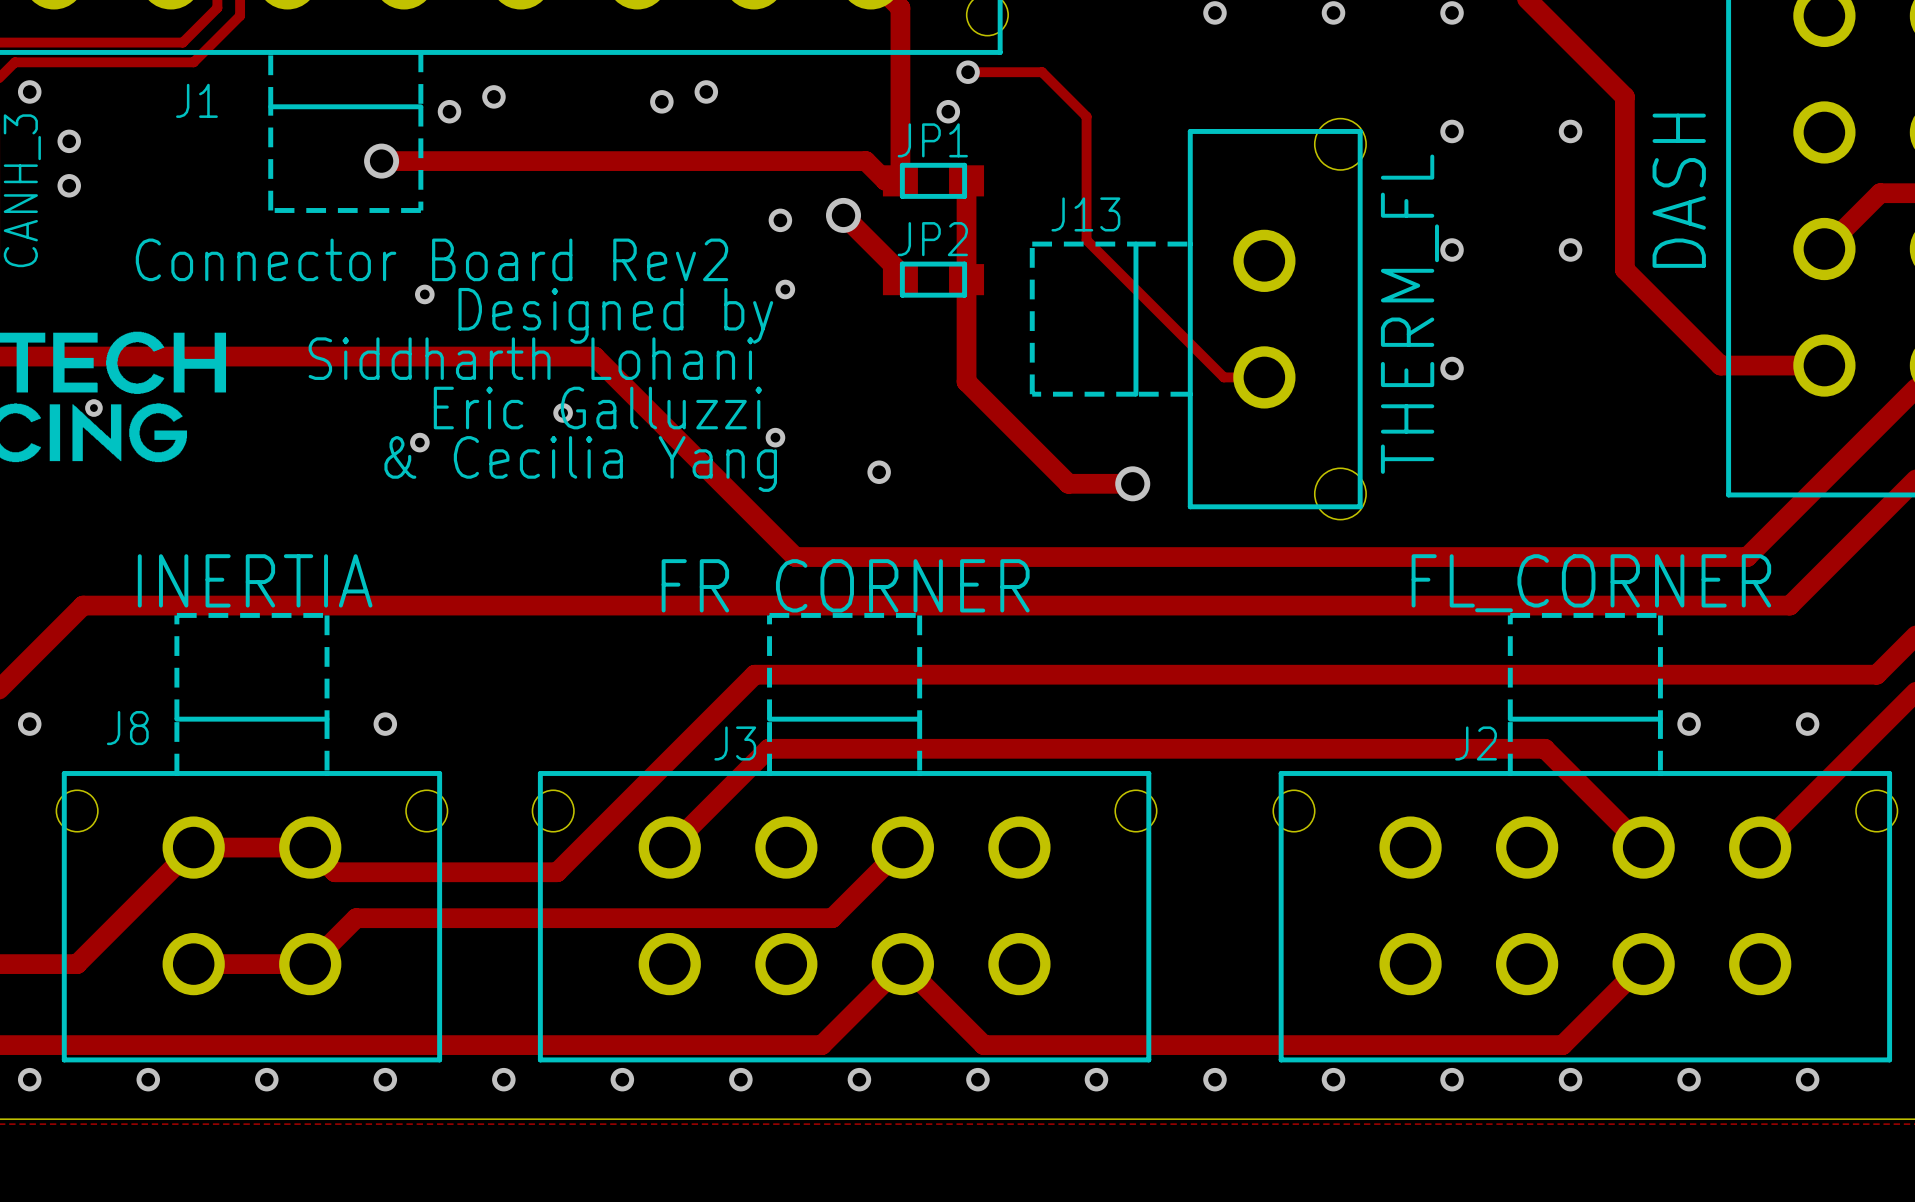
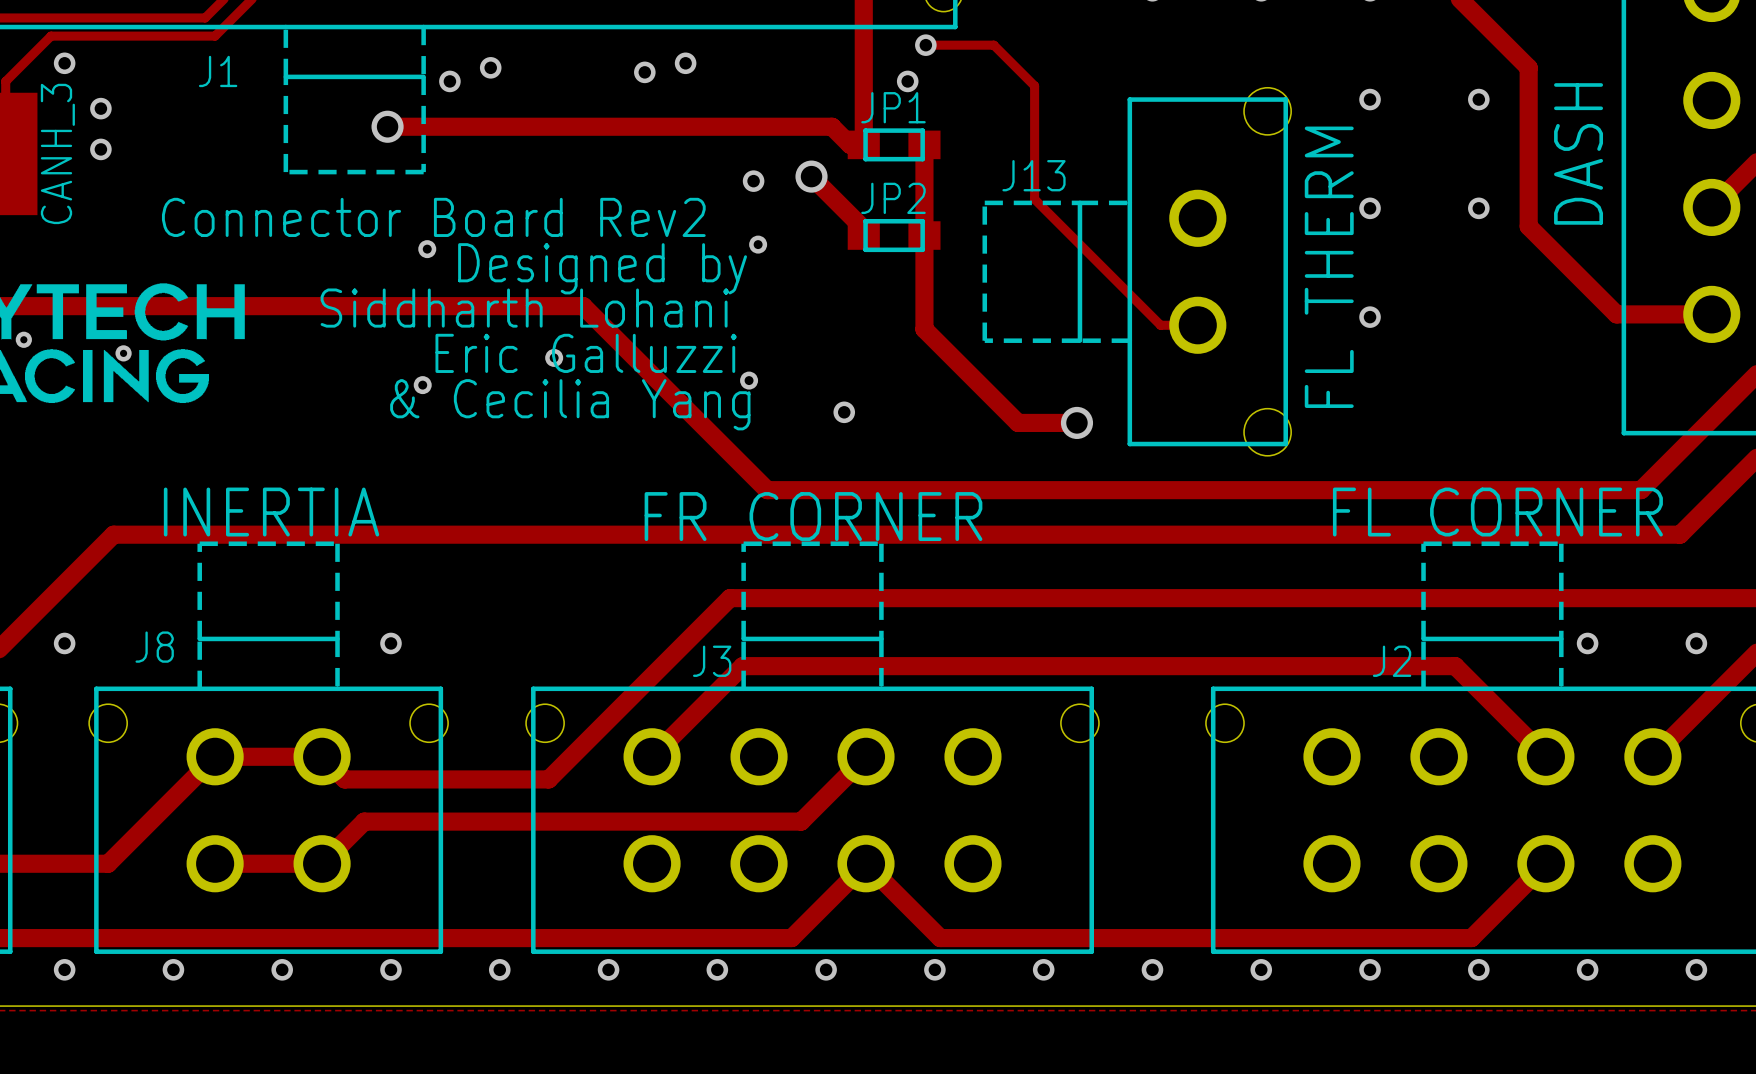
text: THERM_FL (1409, 314) -> FL THERM (1329, 267)
text: FL_CORNER (1591, 583) -> FL CORNER (1497, 512)

